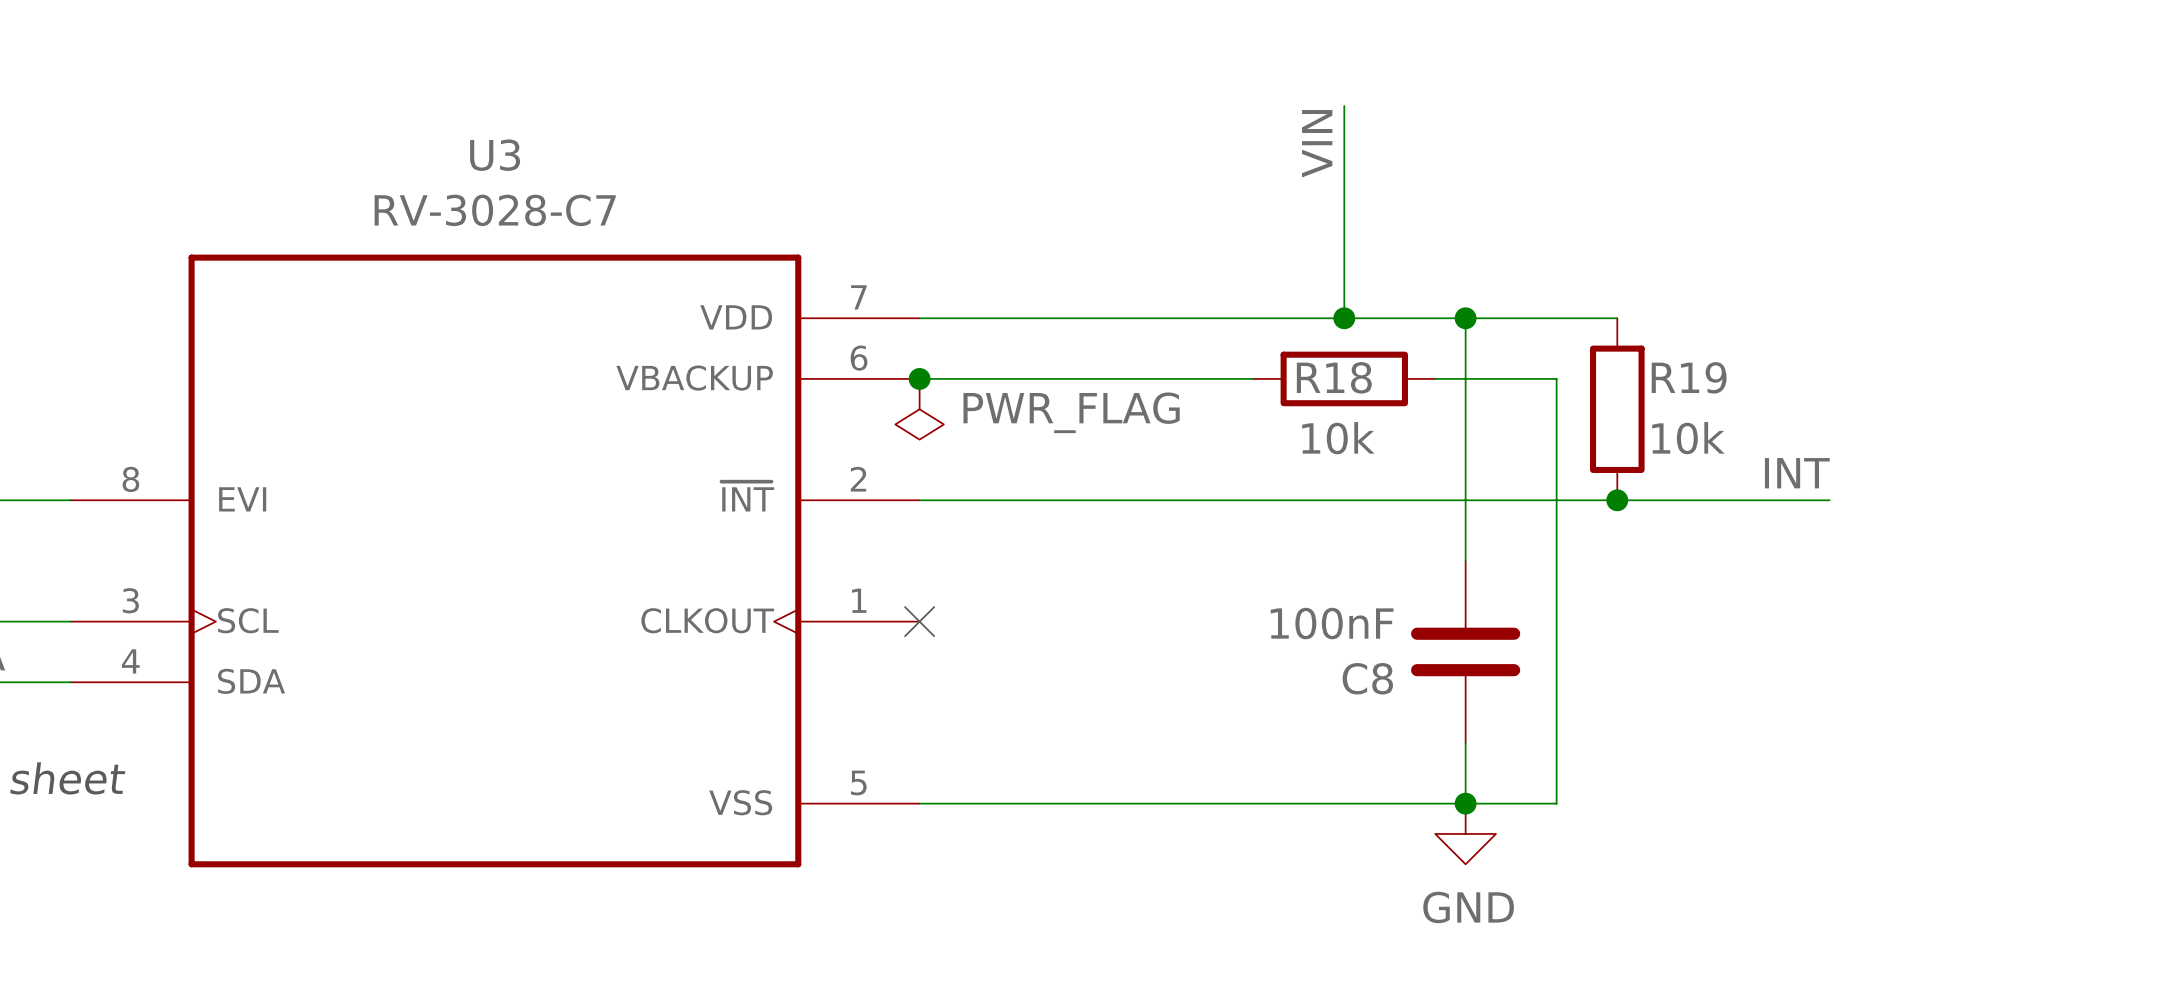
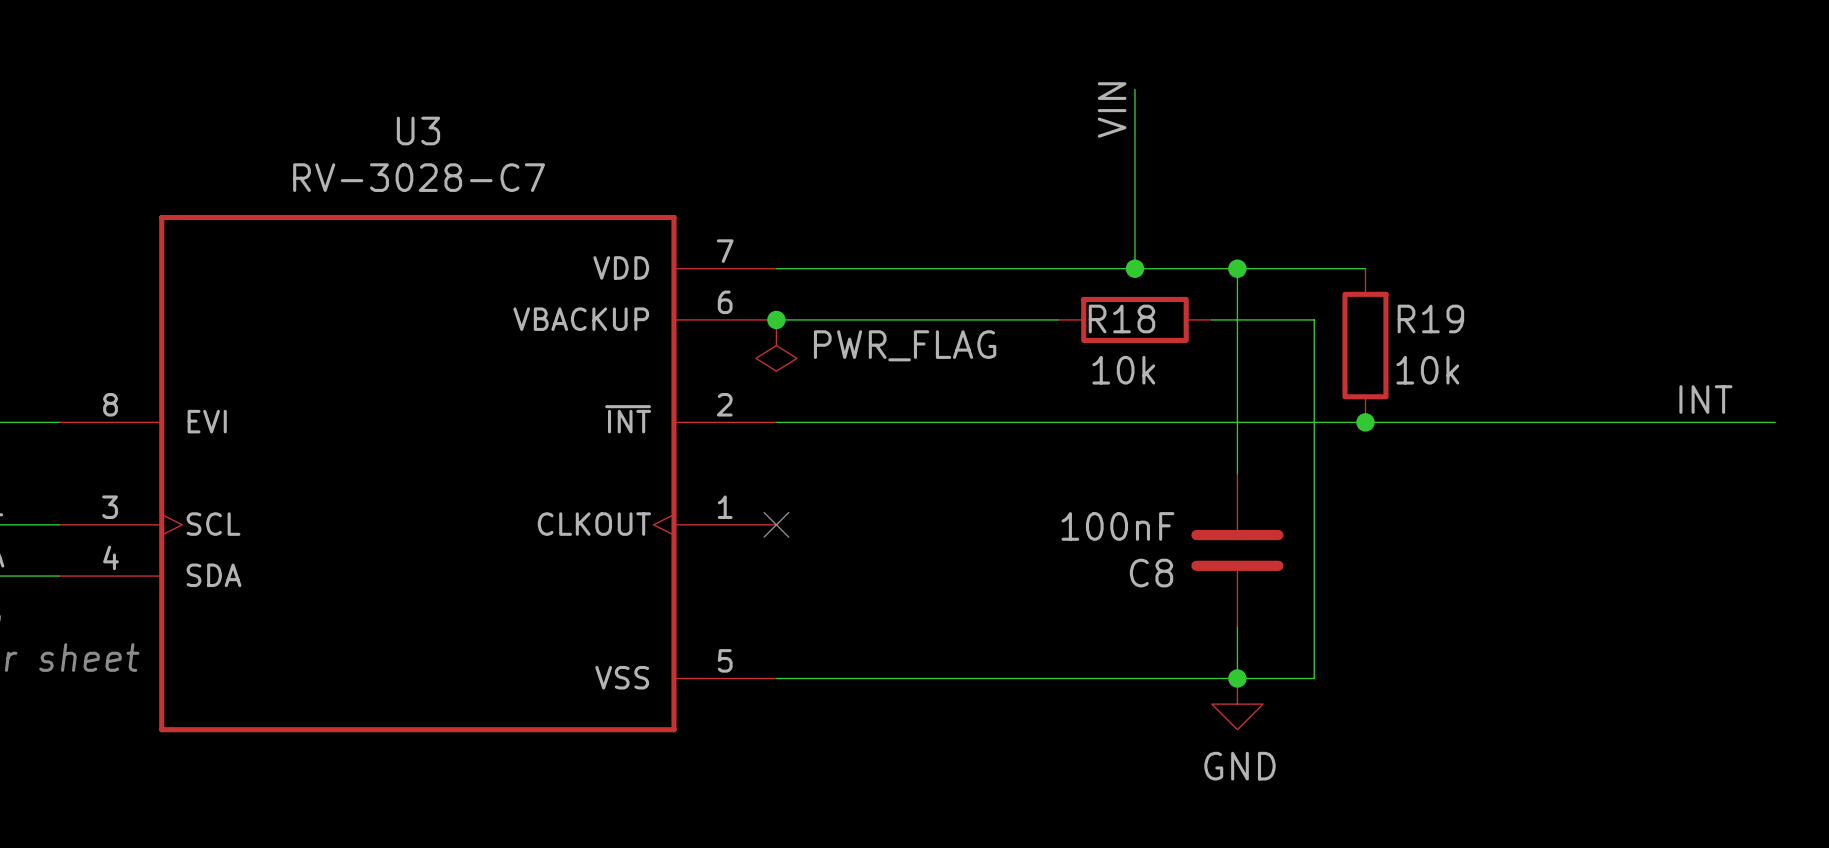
label position: VIN (1317, 143) -> VIN (1112, 109)
label position: INT (1797, 473) -> INT (1705, 399)
wire: none -> (1544, 422) (1775, 422)

